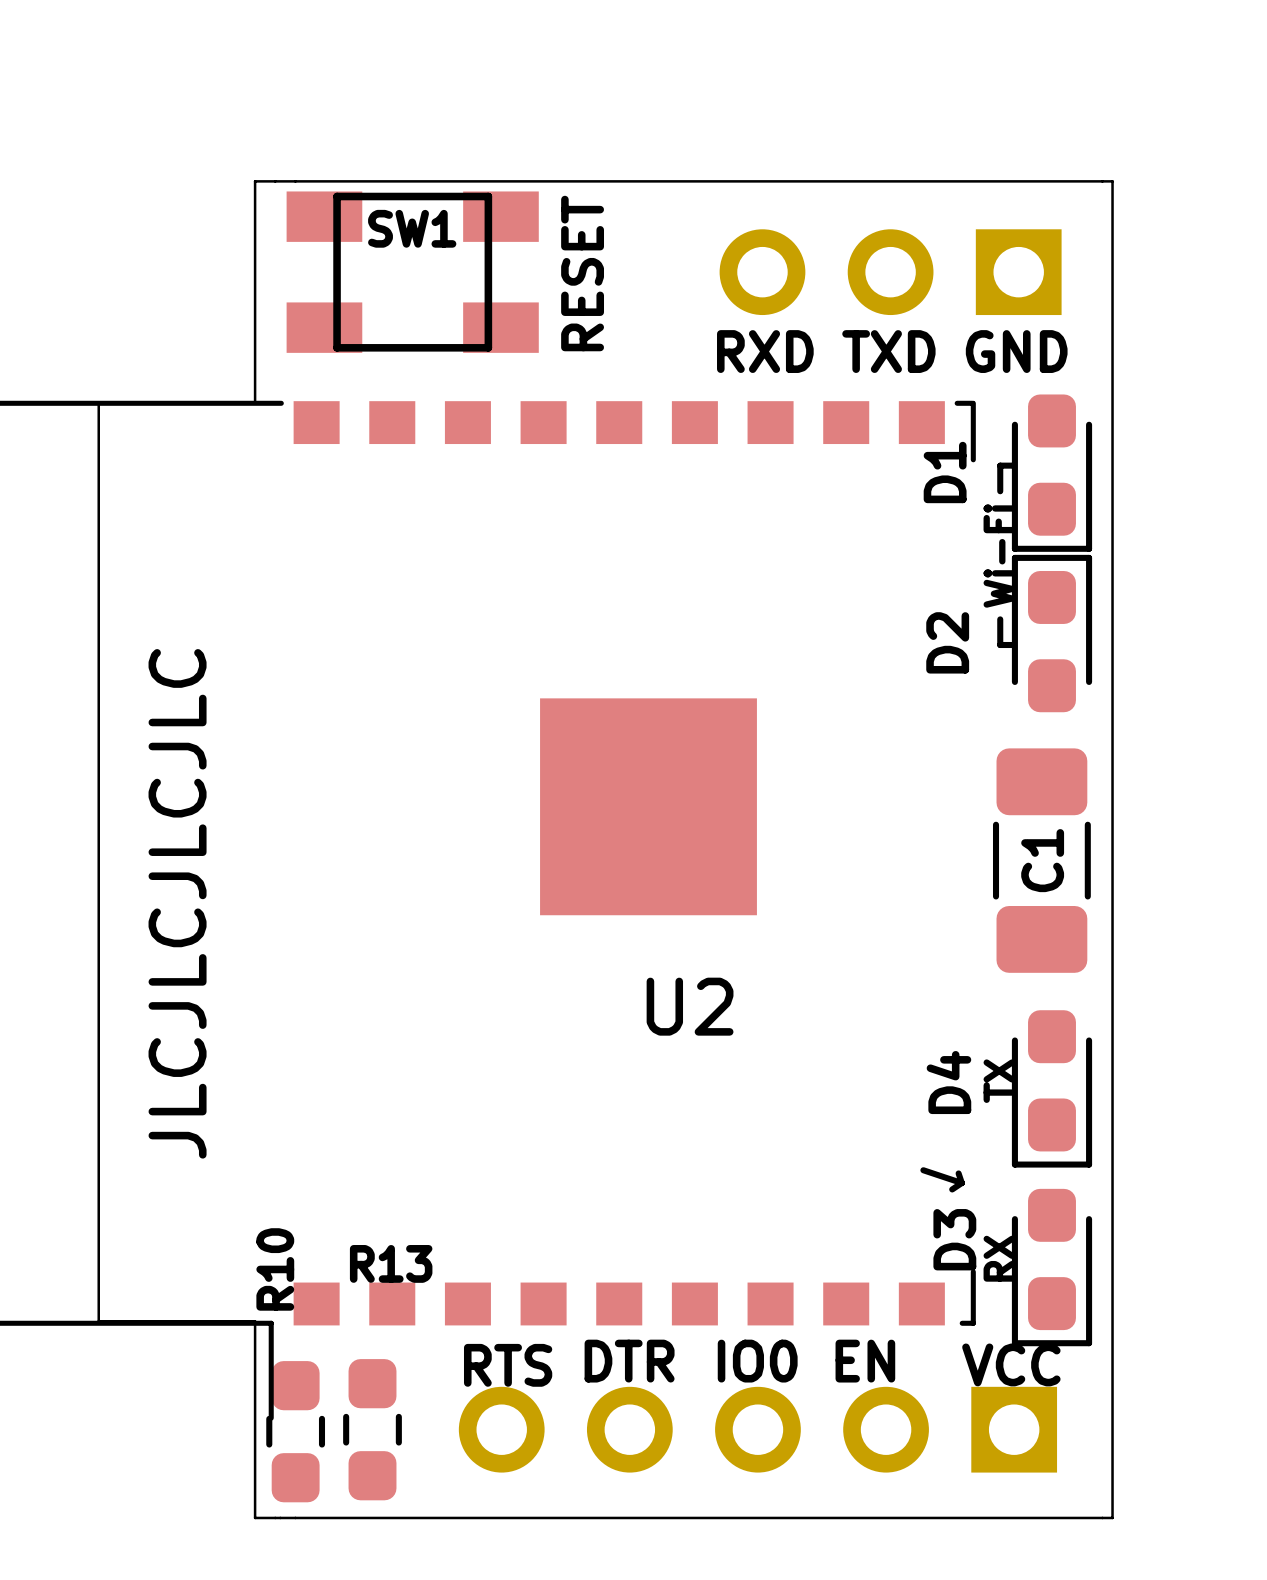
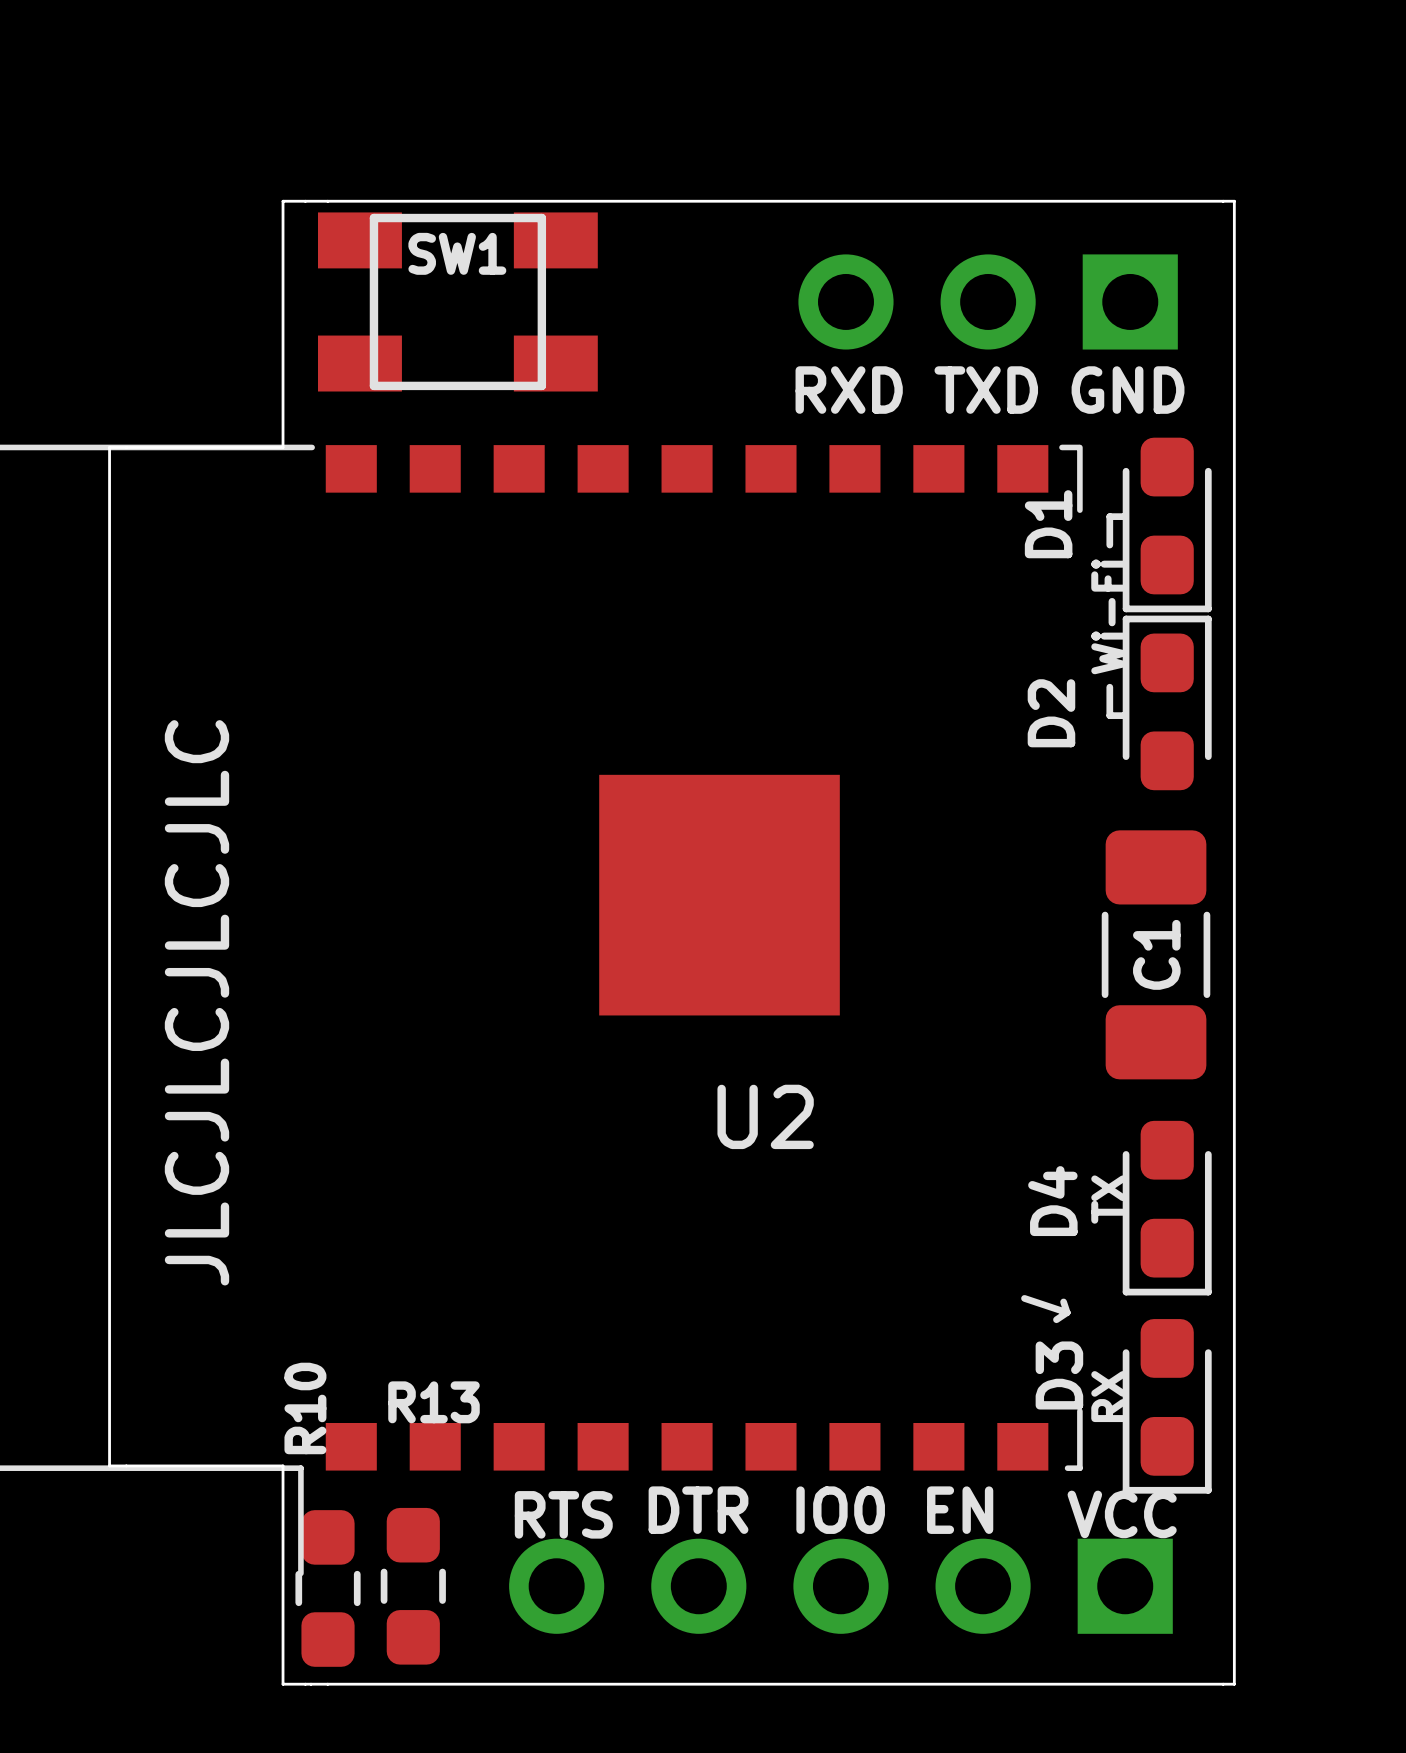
text: RESET (582, 273) -> none

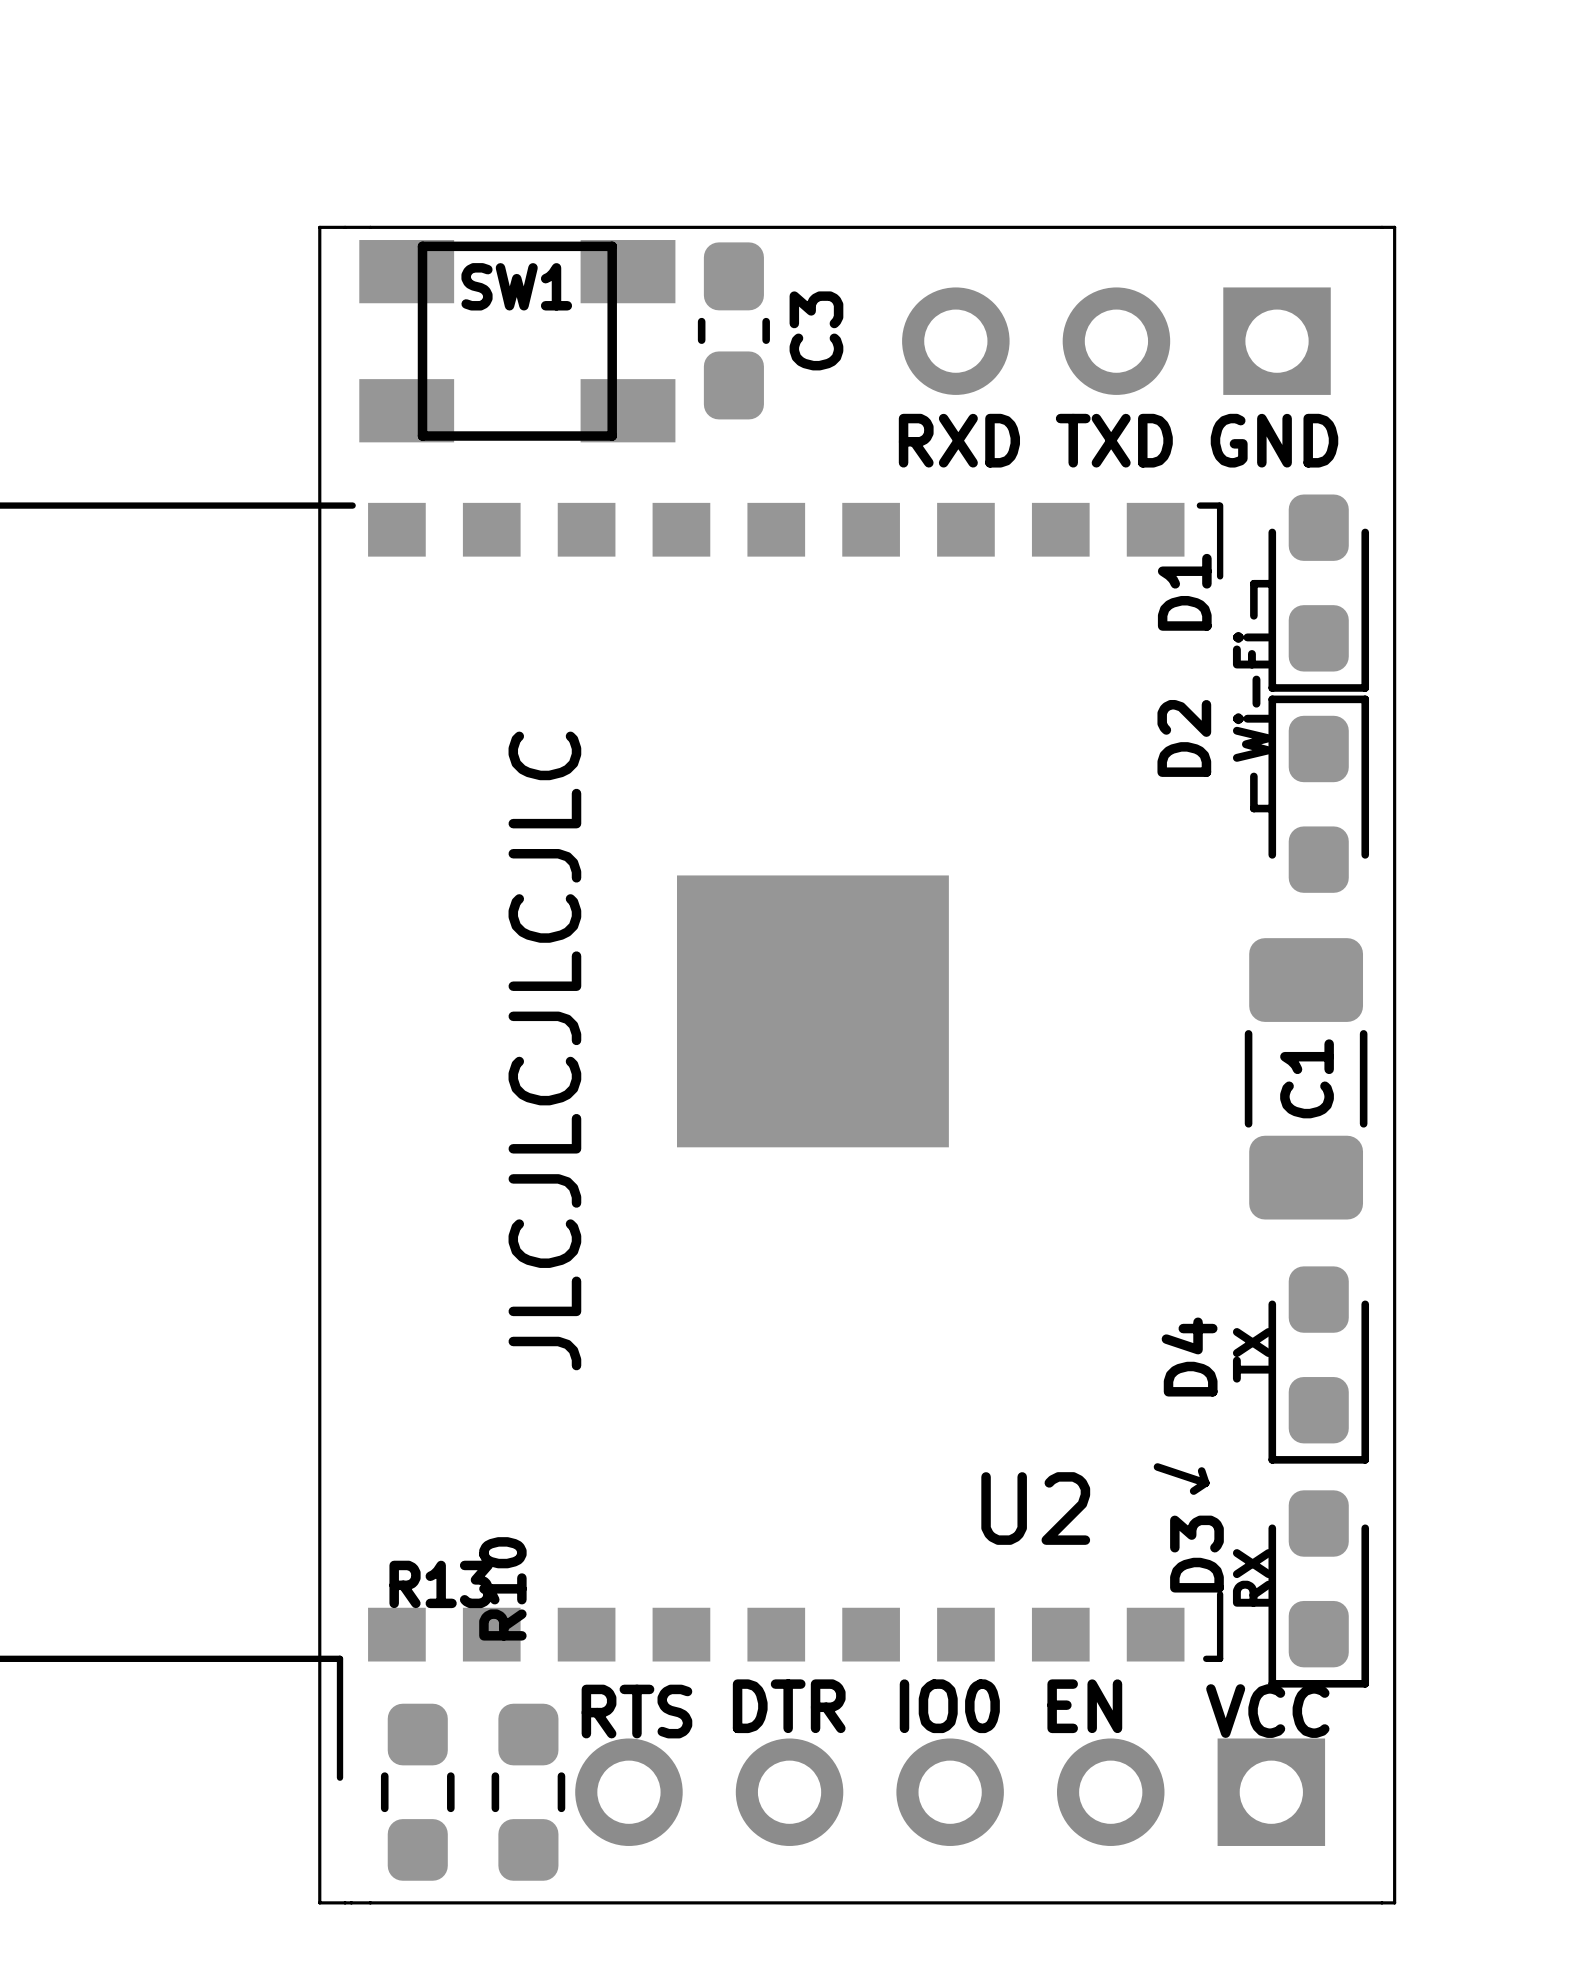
C3: none -> (733, 330)
board edge: (283, 447) (109, 447) (109, 1465) (283, 1465) -> (319, 505) (319, 1656)
D2 name position: D2 (1051, 713) -> D2 (1184, 738)
text position: JLCJLCJLCJLC (196, 1002) -> JLCJLCJLCJLC (544, 1050)
U2 name position: U2 (765, 1116) -> U2 (1035, 1508)
R13 position: (413, 1586) -> (417, 1792)
R10 position: (328, 1588) -> (528, 1792)

